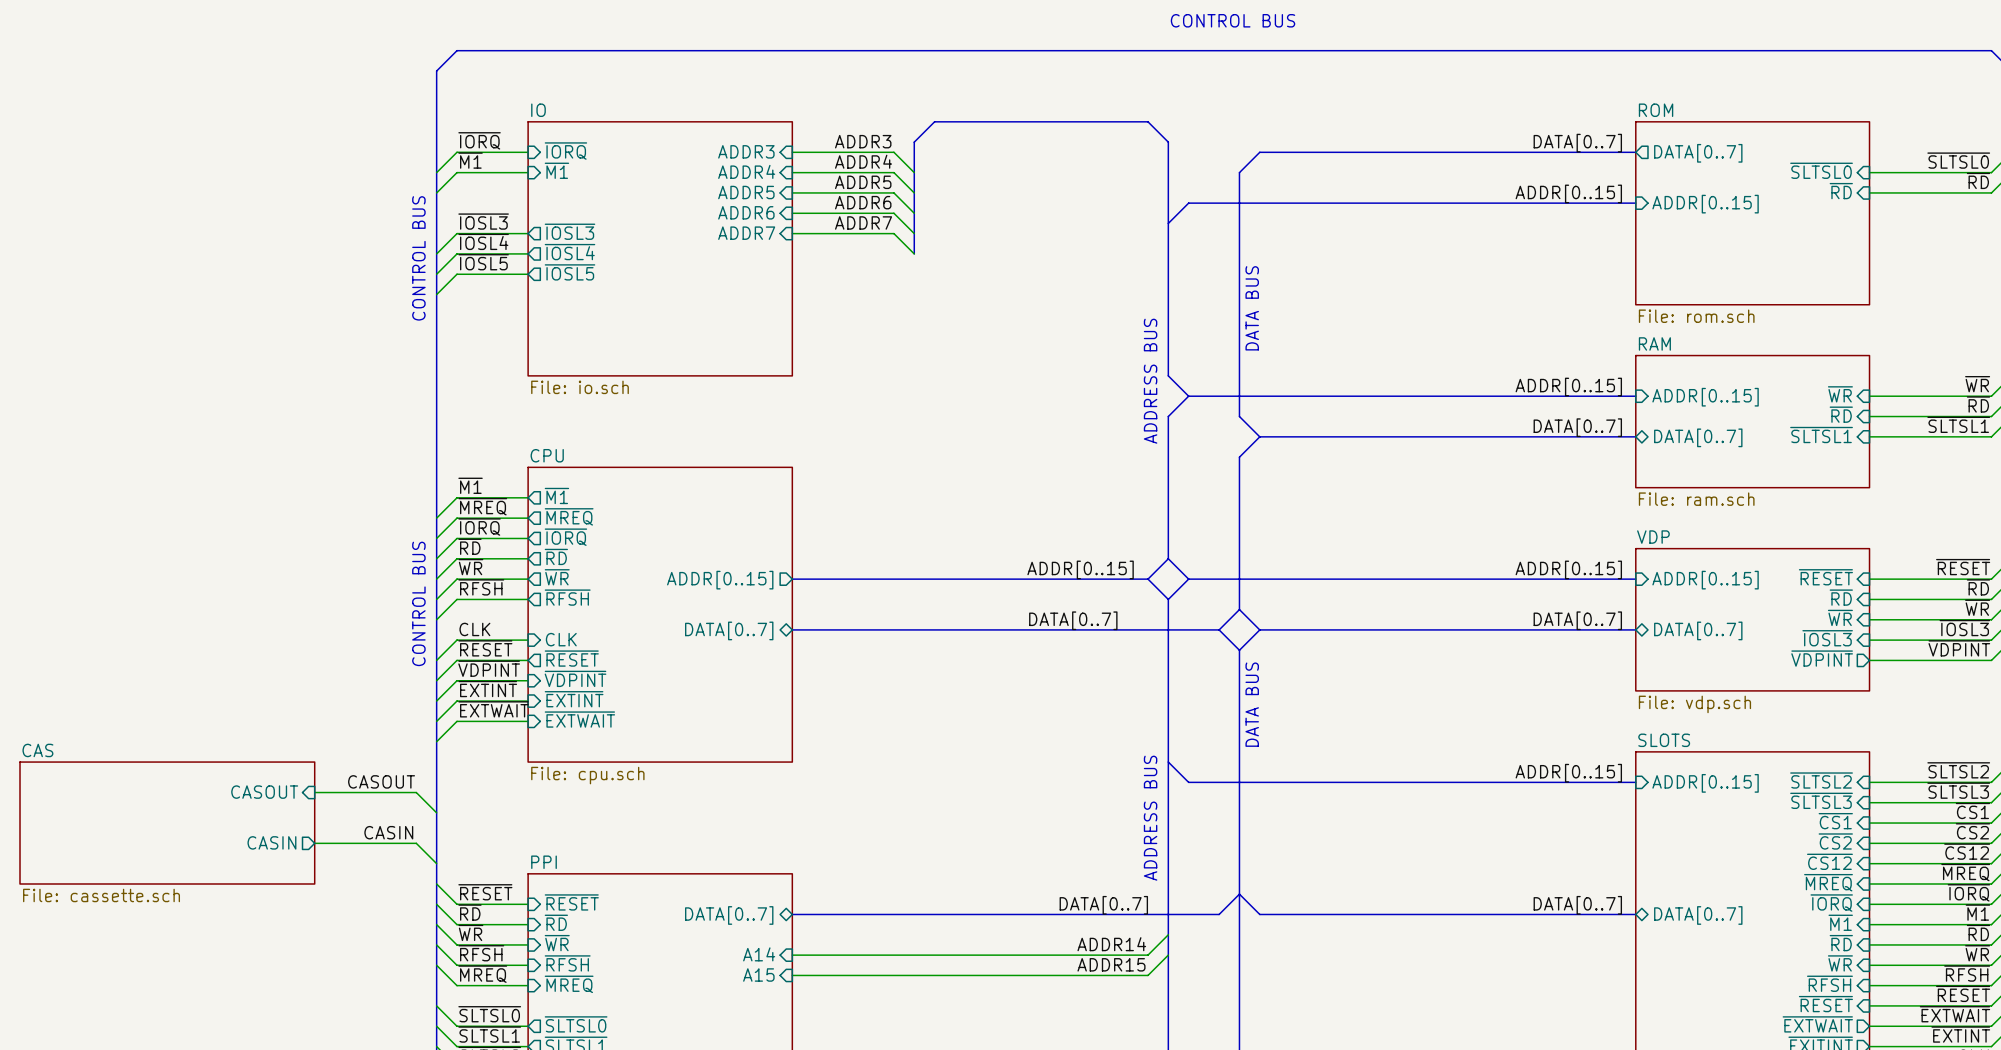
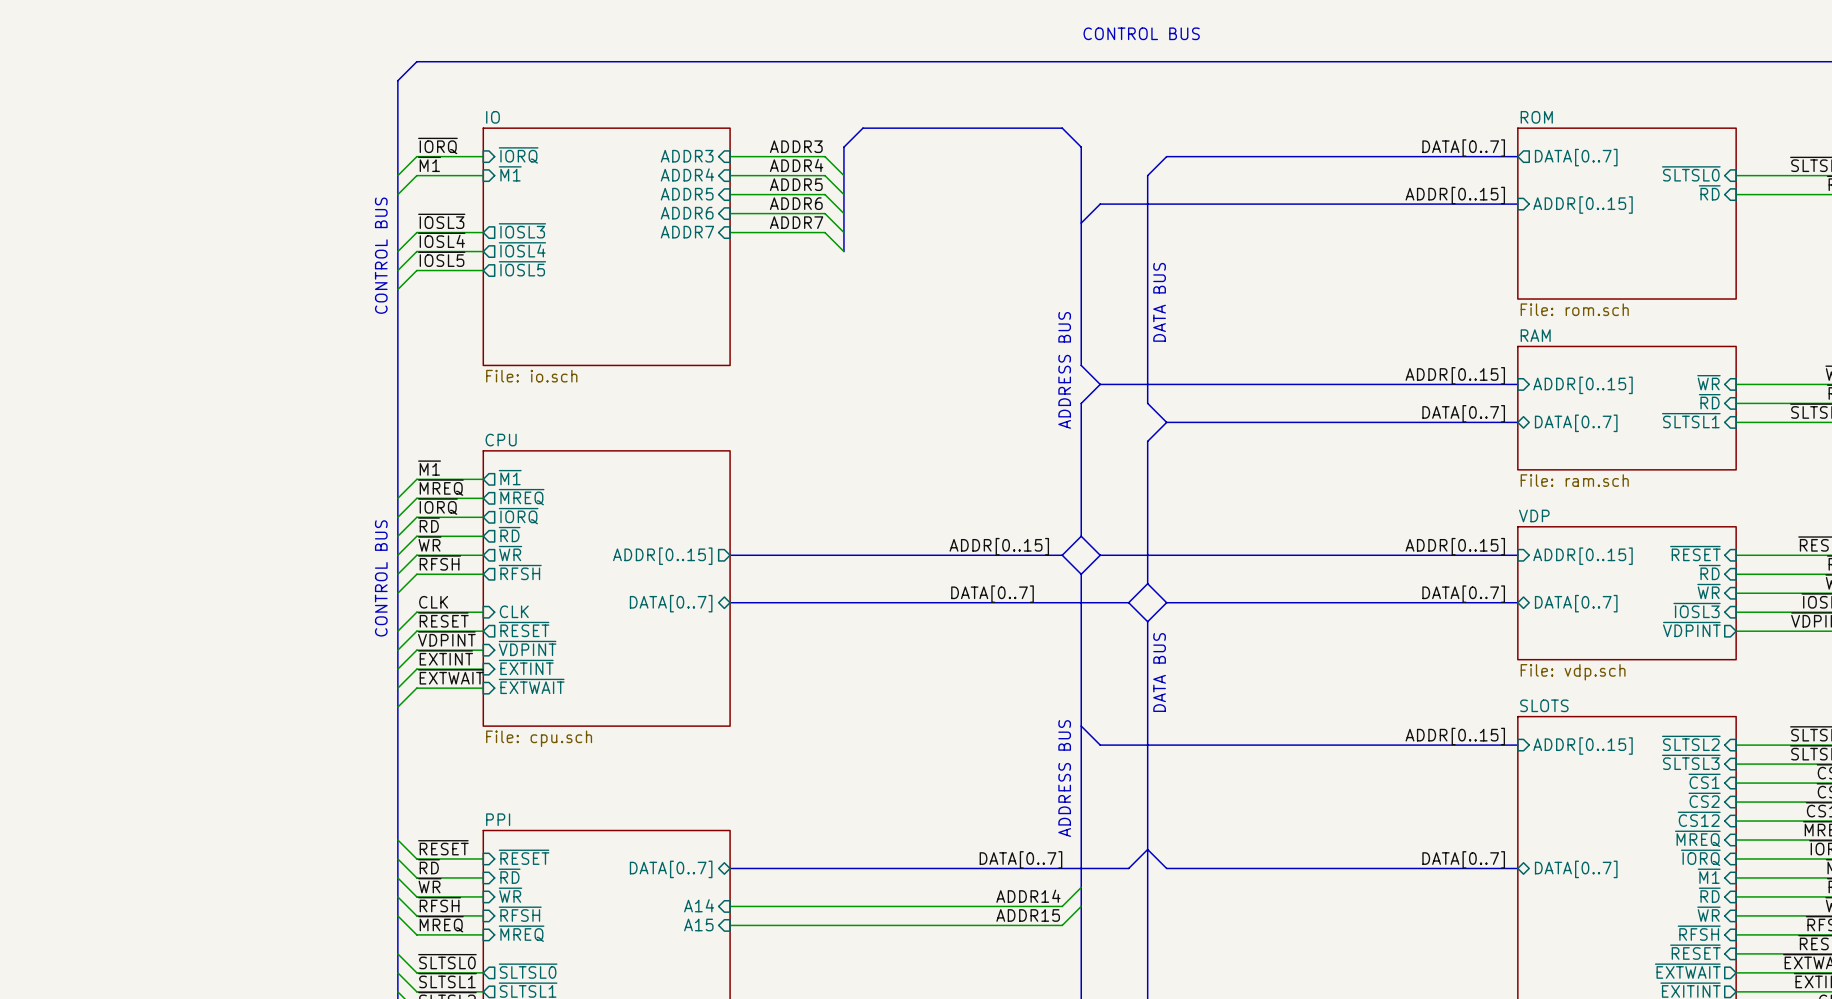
label: CASOUT (381, 781) -> none
sheet pin: CASOUT (264, 792) -> none
wire: (314, 792) (416, 792) (436, 812) -> none
sheet CAS: File: cassette.sch (167, 823) -> none
label: CASIN (388, 832) -> none
sheet pin: CASIN (271, 842) -> none
wire: (314, 843) (416, 843) (436, 863) -> none

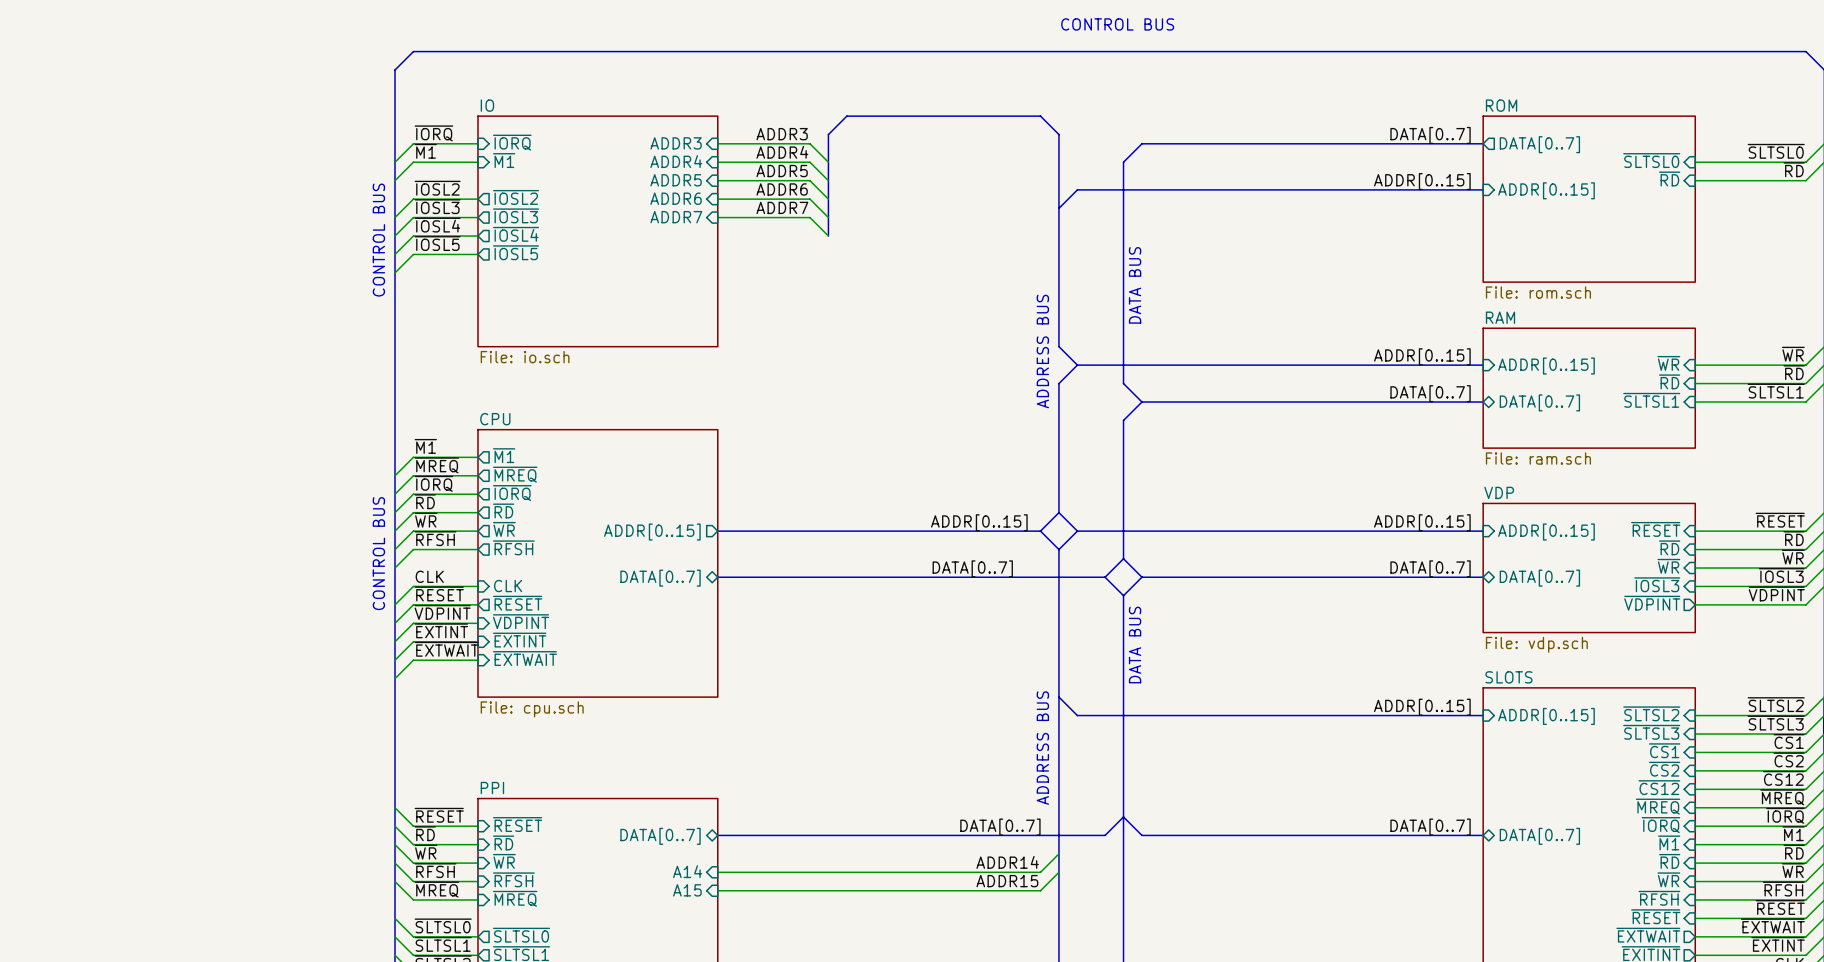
label: none -> ~{IOSL2} (437, 188)
sheet pin: none -> ~{IOSL2} (516, 197)
wire: none -> (478, 199) (413, 199) (395, 217)

